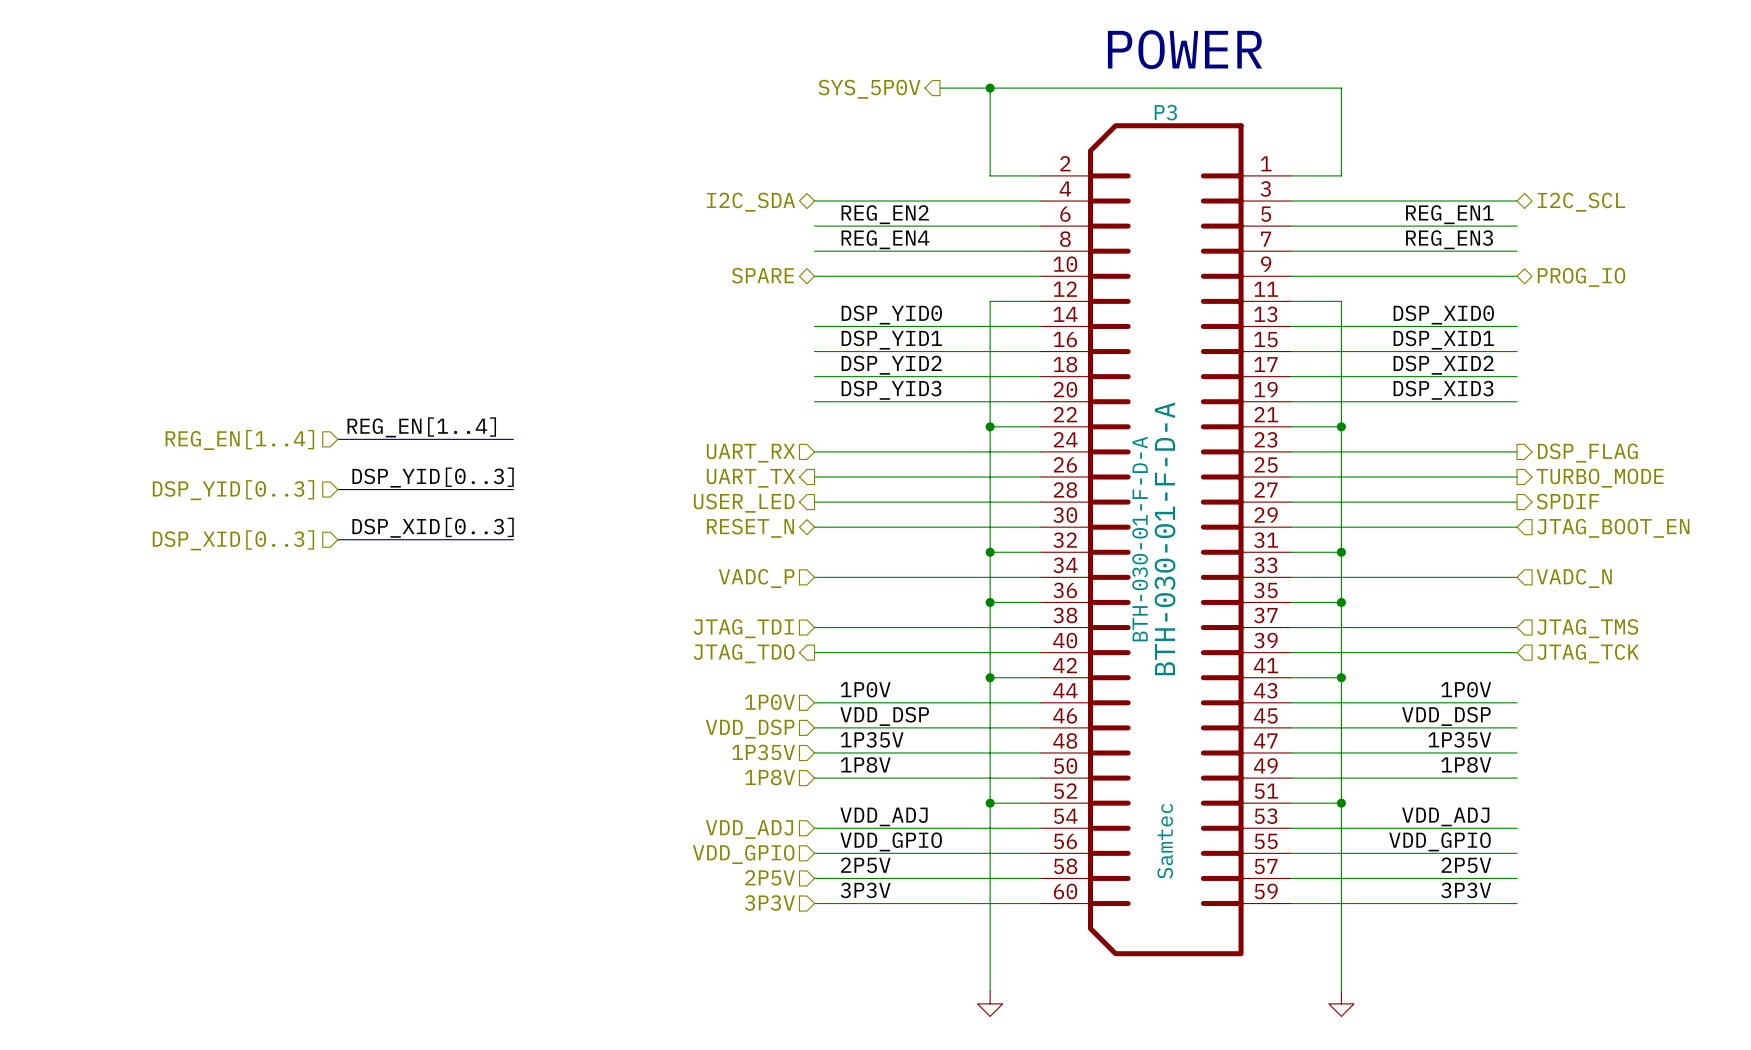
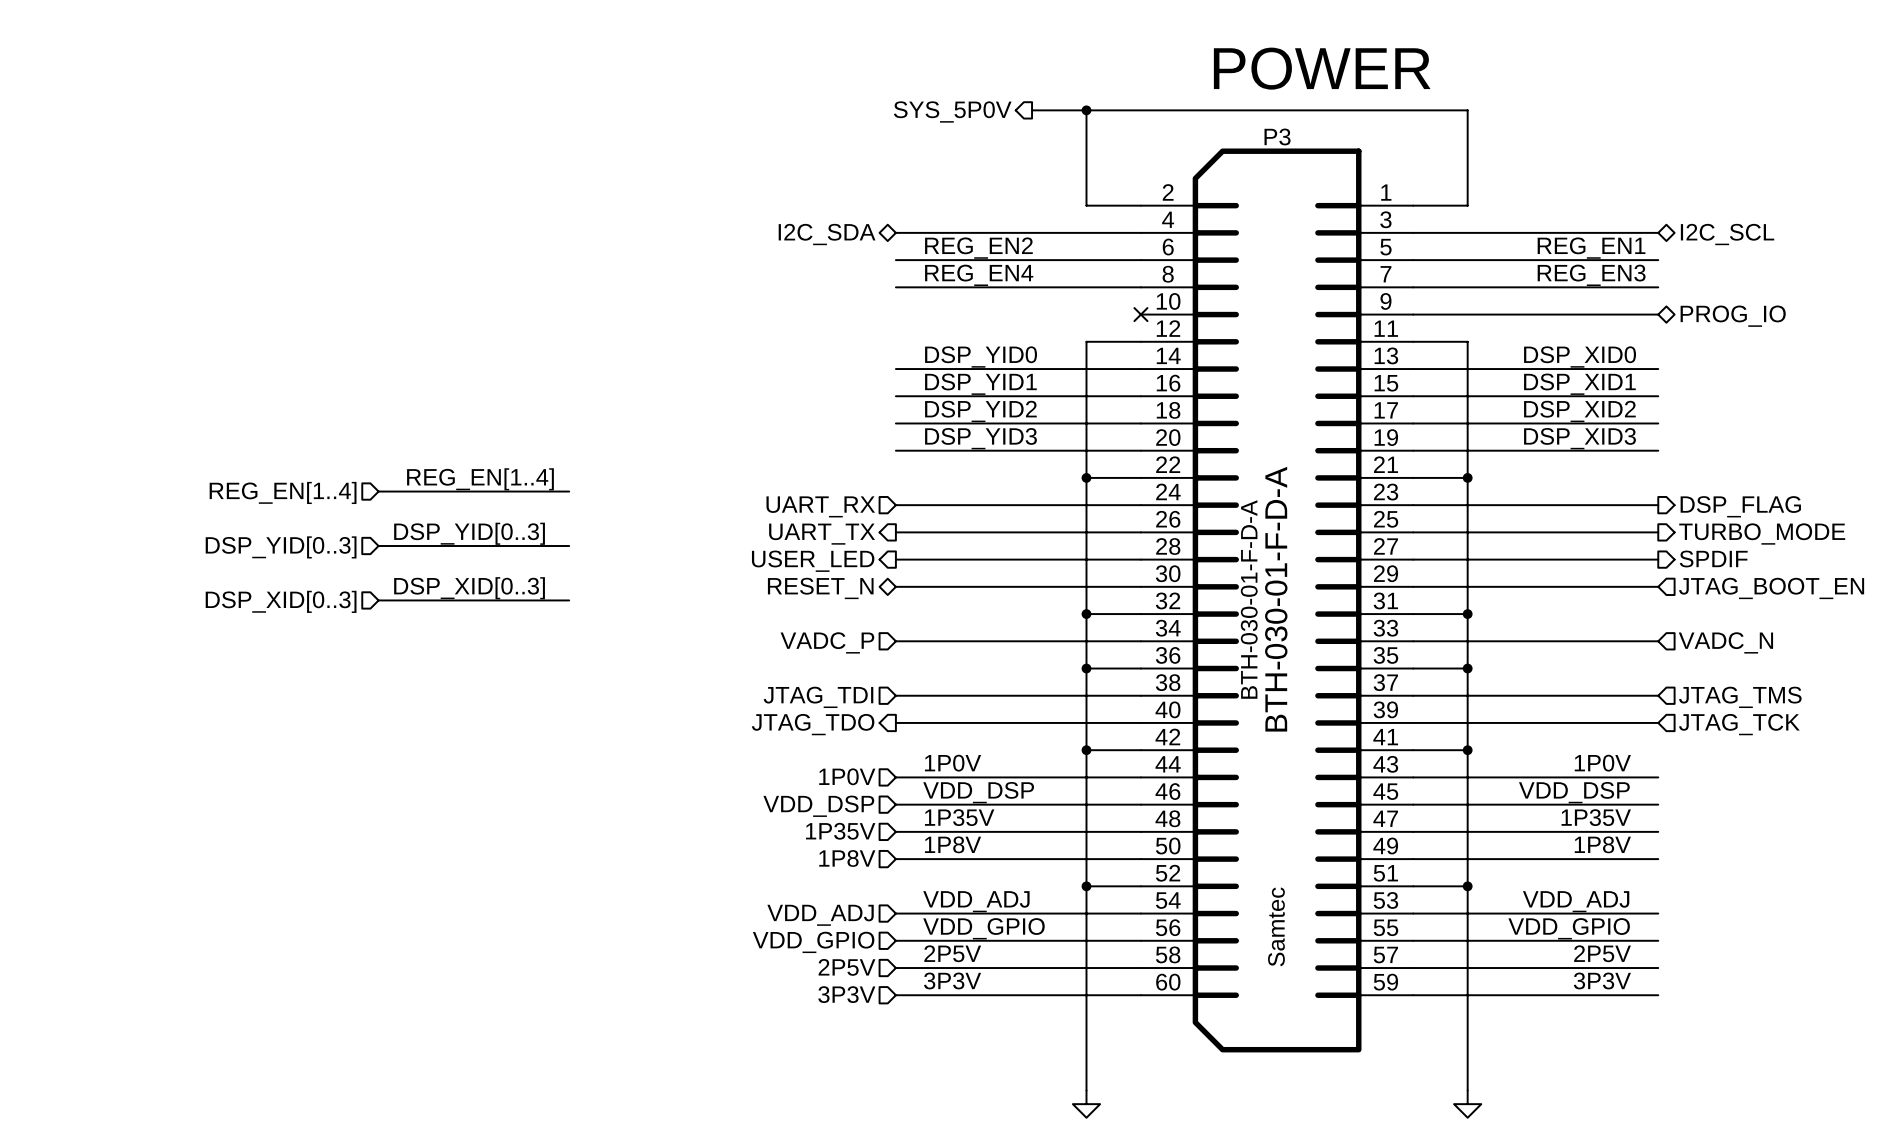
hierarchical label: SPARE (762, 275) -> none
wire: (814, 276) (1040, 276) -> none
no-connect mark: none -> (1140, 314)

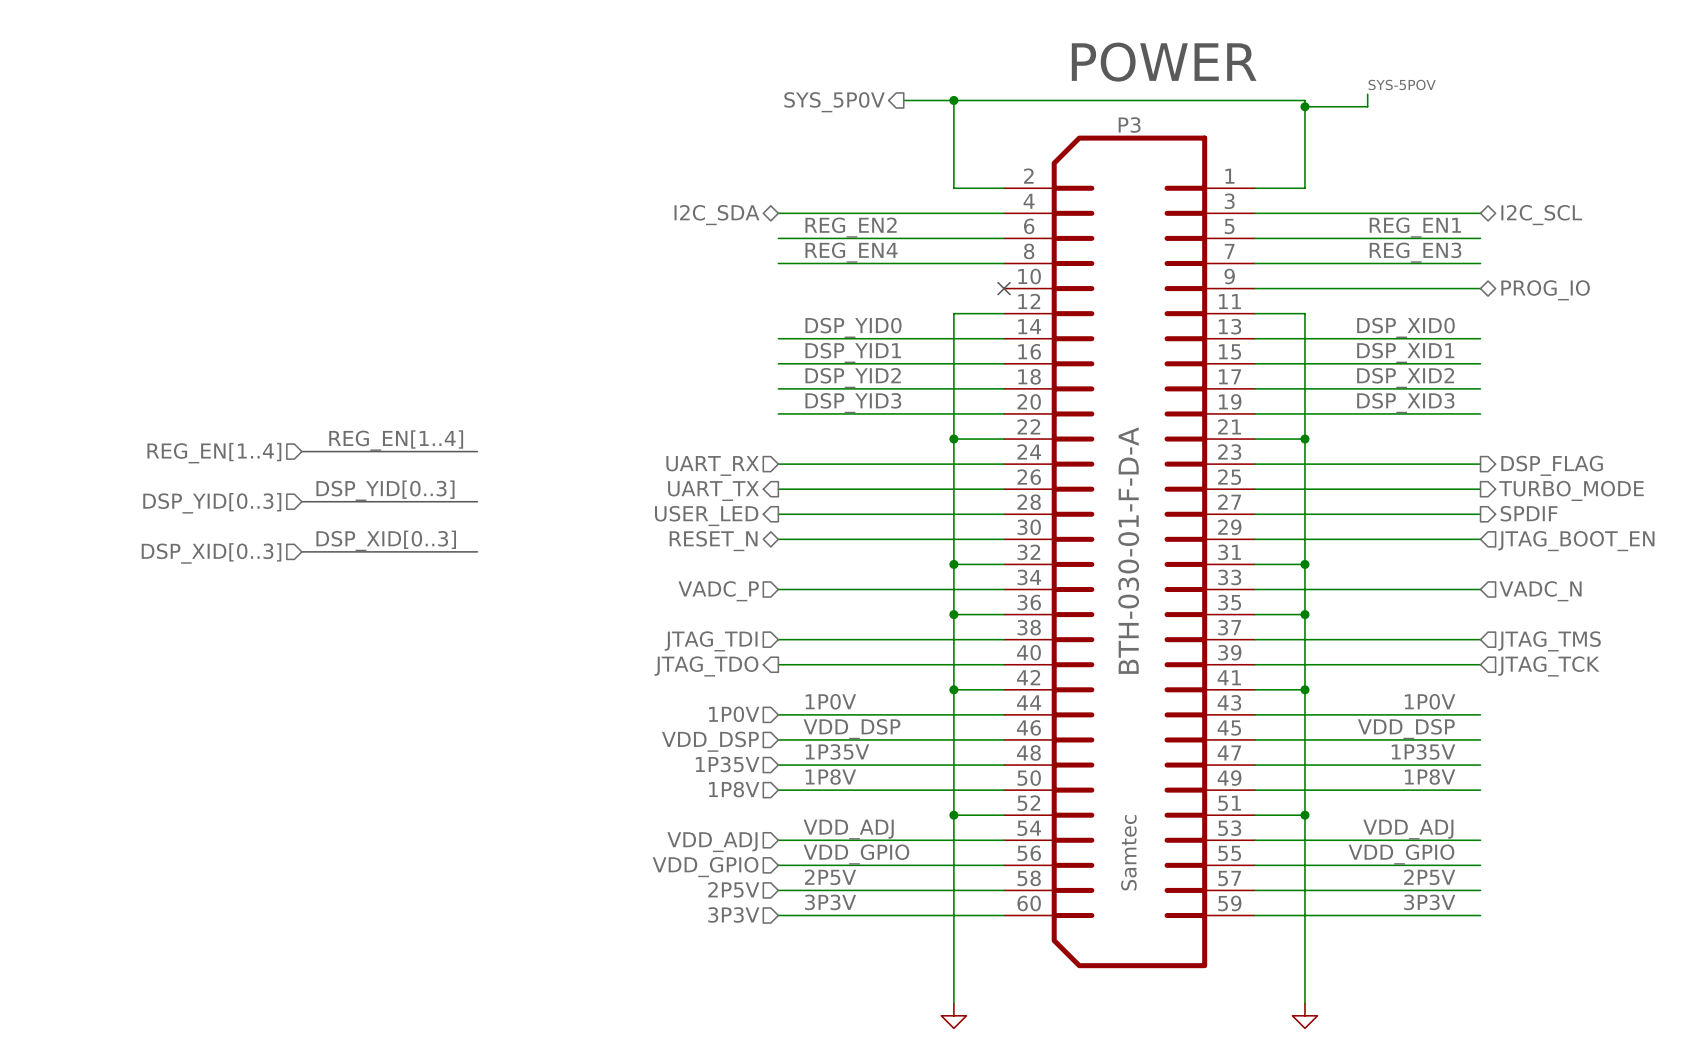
label: none -> SYS-5POV (1402, 84)
wire: none -> (1367, 94) (1367, 106) (1304, 106)
junction: none -> (1304, 106)
P3 value: BTH-030-01-F-D-A (1249, 599) -> none

